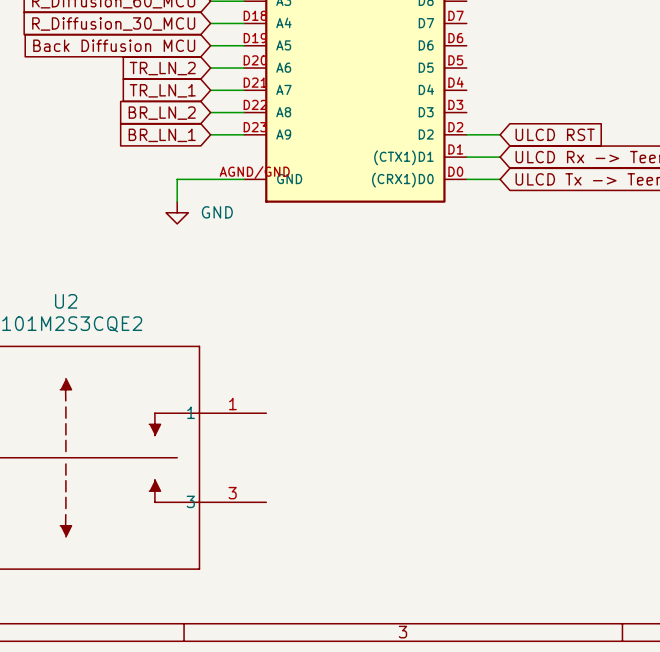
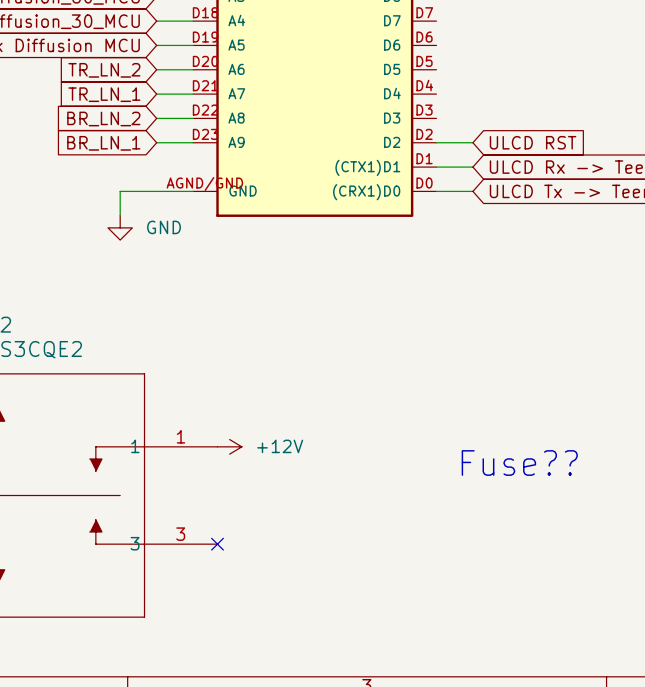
power symbol: none -> +12V (229, 446)
text: none -> Fuse?? (519, 463)
no-connect mark: none -> (217, 544)

